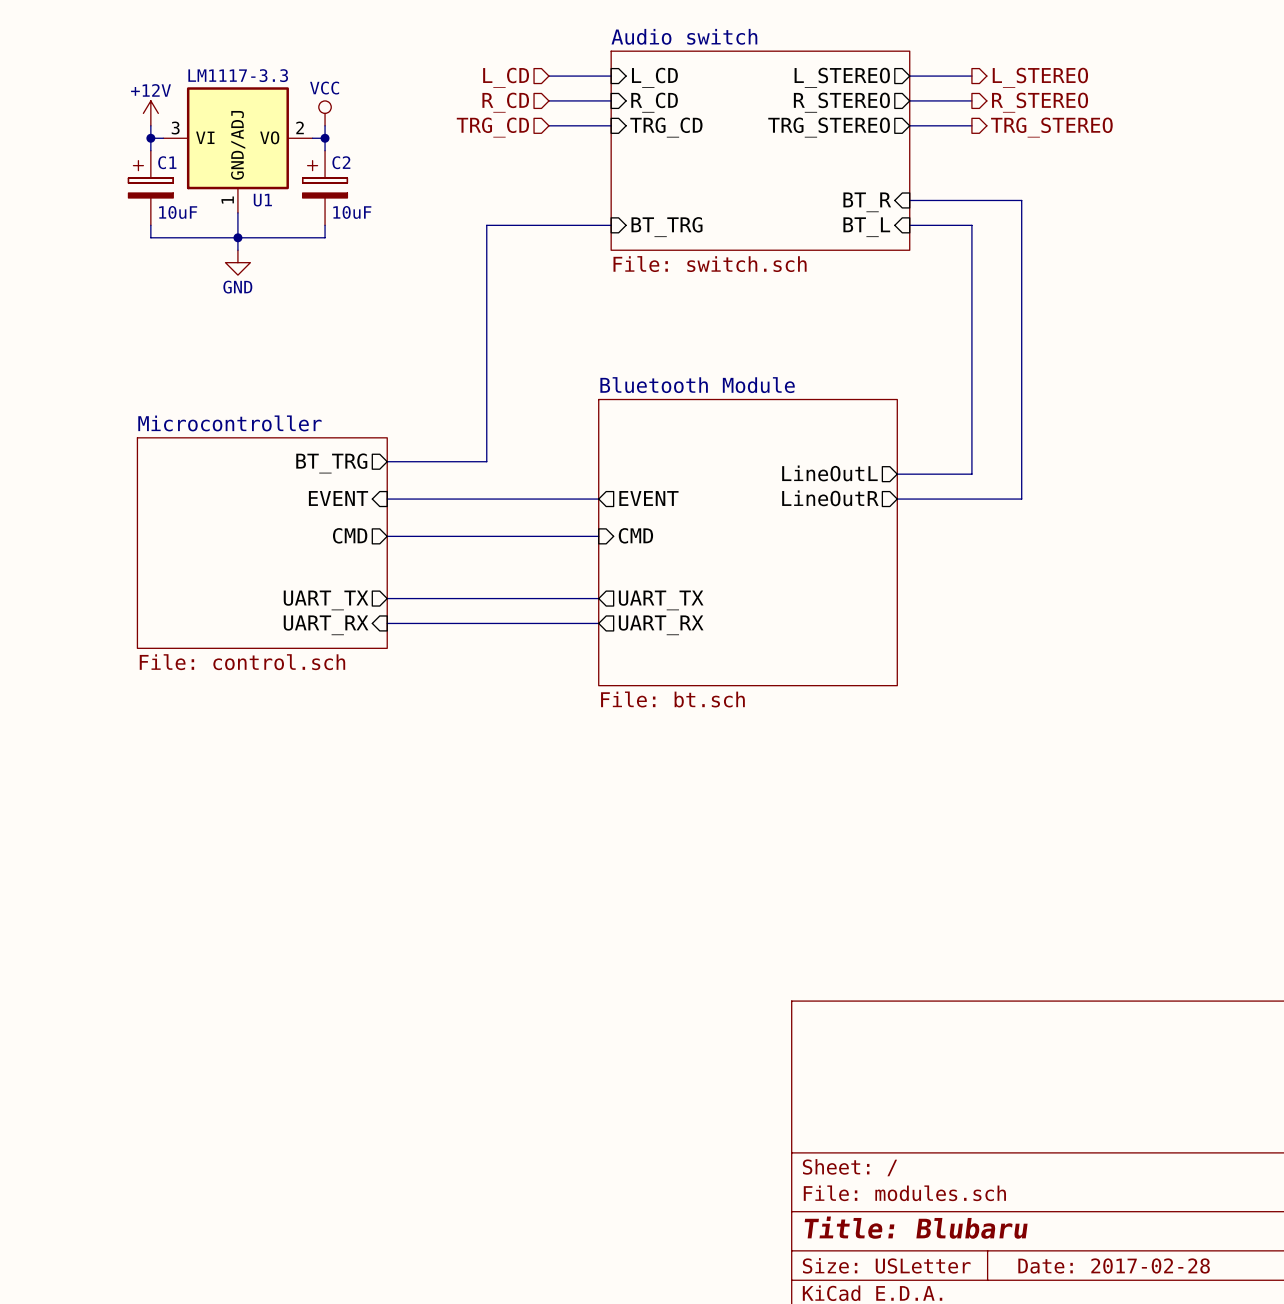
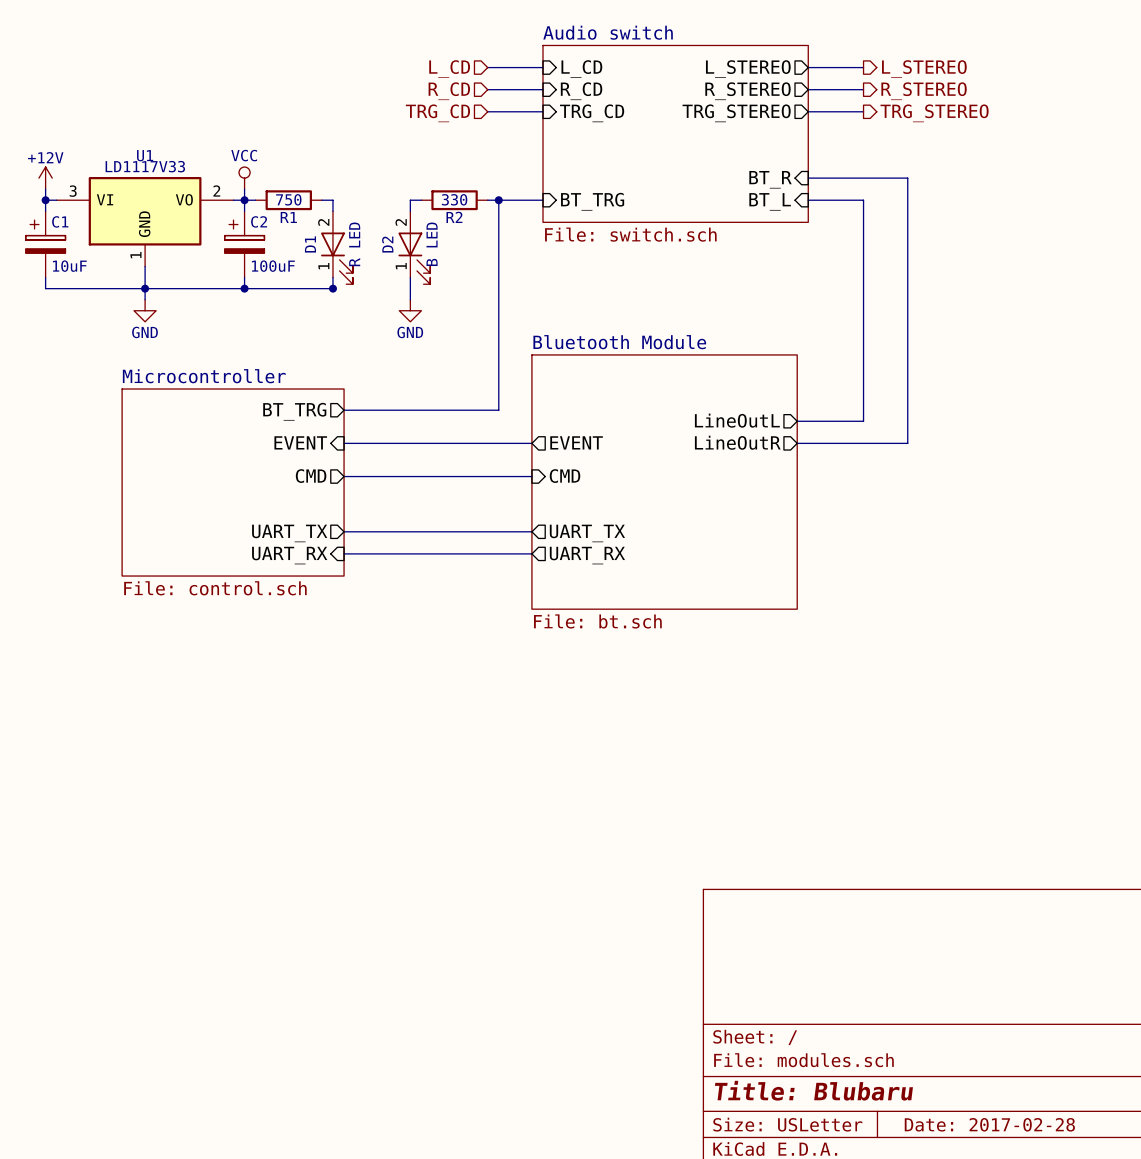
U1 value: LM1117-3.3 (238, 75) -> LD1117V33 (145, 166)
U1 symbol: [163, 87, 313, 213] -> [56, 177, 234, 267]
power symbol position: +12V (150, 113) -> +12V (45, 178)
power symbol position: VCC (325, 113) -> VCC (244, 178)
wire: (150, 125) (150, 150) -> (45, 189) (45, 211)
wire: (325, 125) (325, 150) -> (244, 189) (244, 211)
wire: (150, 138) (163, 138) -> (45, 200) (56, 200)
junction: (150, 138) -> none
wire: (312, 138) (325, 138) -> none
junction: (325, 138) -> none
C1 position: (150, 188) -> (45, 244)
C2 position: (325, 188) -> (244, 244)
U1 name position: U1 (262, 200) -> U1 (145, 155)
wire: (237, 212) (237, 250) -> (145, 266) (145, 299)
C2 value: 10uF (352, 212) -> 100uF (273, 266)
junction: none -> (45, 200)
wire: (150, 225) (150, 237) (325, 237) (325, 225) -> none
wire: none -> (233, 200) (255, 200)
R1: none -> 750 (288, 200)
wire: none -> (321, 200) (332, 200) (332, 211)
wire: none -> (421, 200) (410, 200) (410, 211)
R2: none -> 330 (454, 200)
wire: (548, 225) (486, 225) (486, 461) -> (498, 200) (498, 410) (432, 410)
junction: none -> (498, 200)
junction position: (237, 237) -> (244, 200)
power symbol position: GND (237, 262) -> GND (145, 310)
D1: none -> R LED (336, 247)
D2: none -> B LED (414, 247)
wire: none -> (45, 277) (45, 288) (332, 288) (332, 277)
wire: none -> (244, 277) (244, 288)
wire: none -> (410, 277) (410, 299)
junction: none -> (145, 288)
junction: none -> (244, 288)
junction: none -> (332, 288)
power symbol: none -> GND (410, 310)

